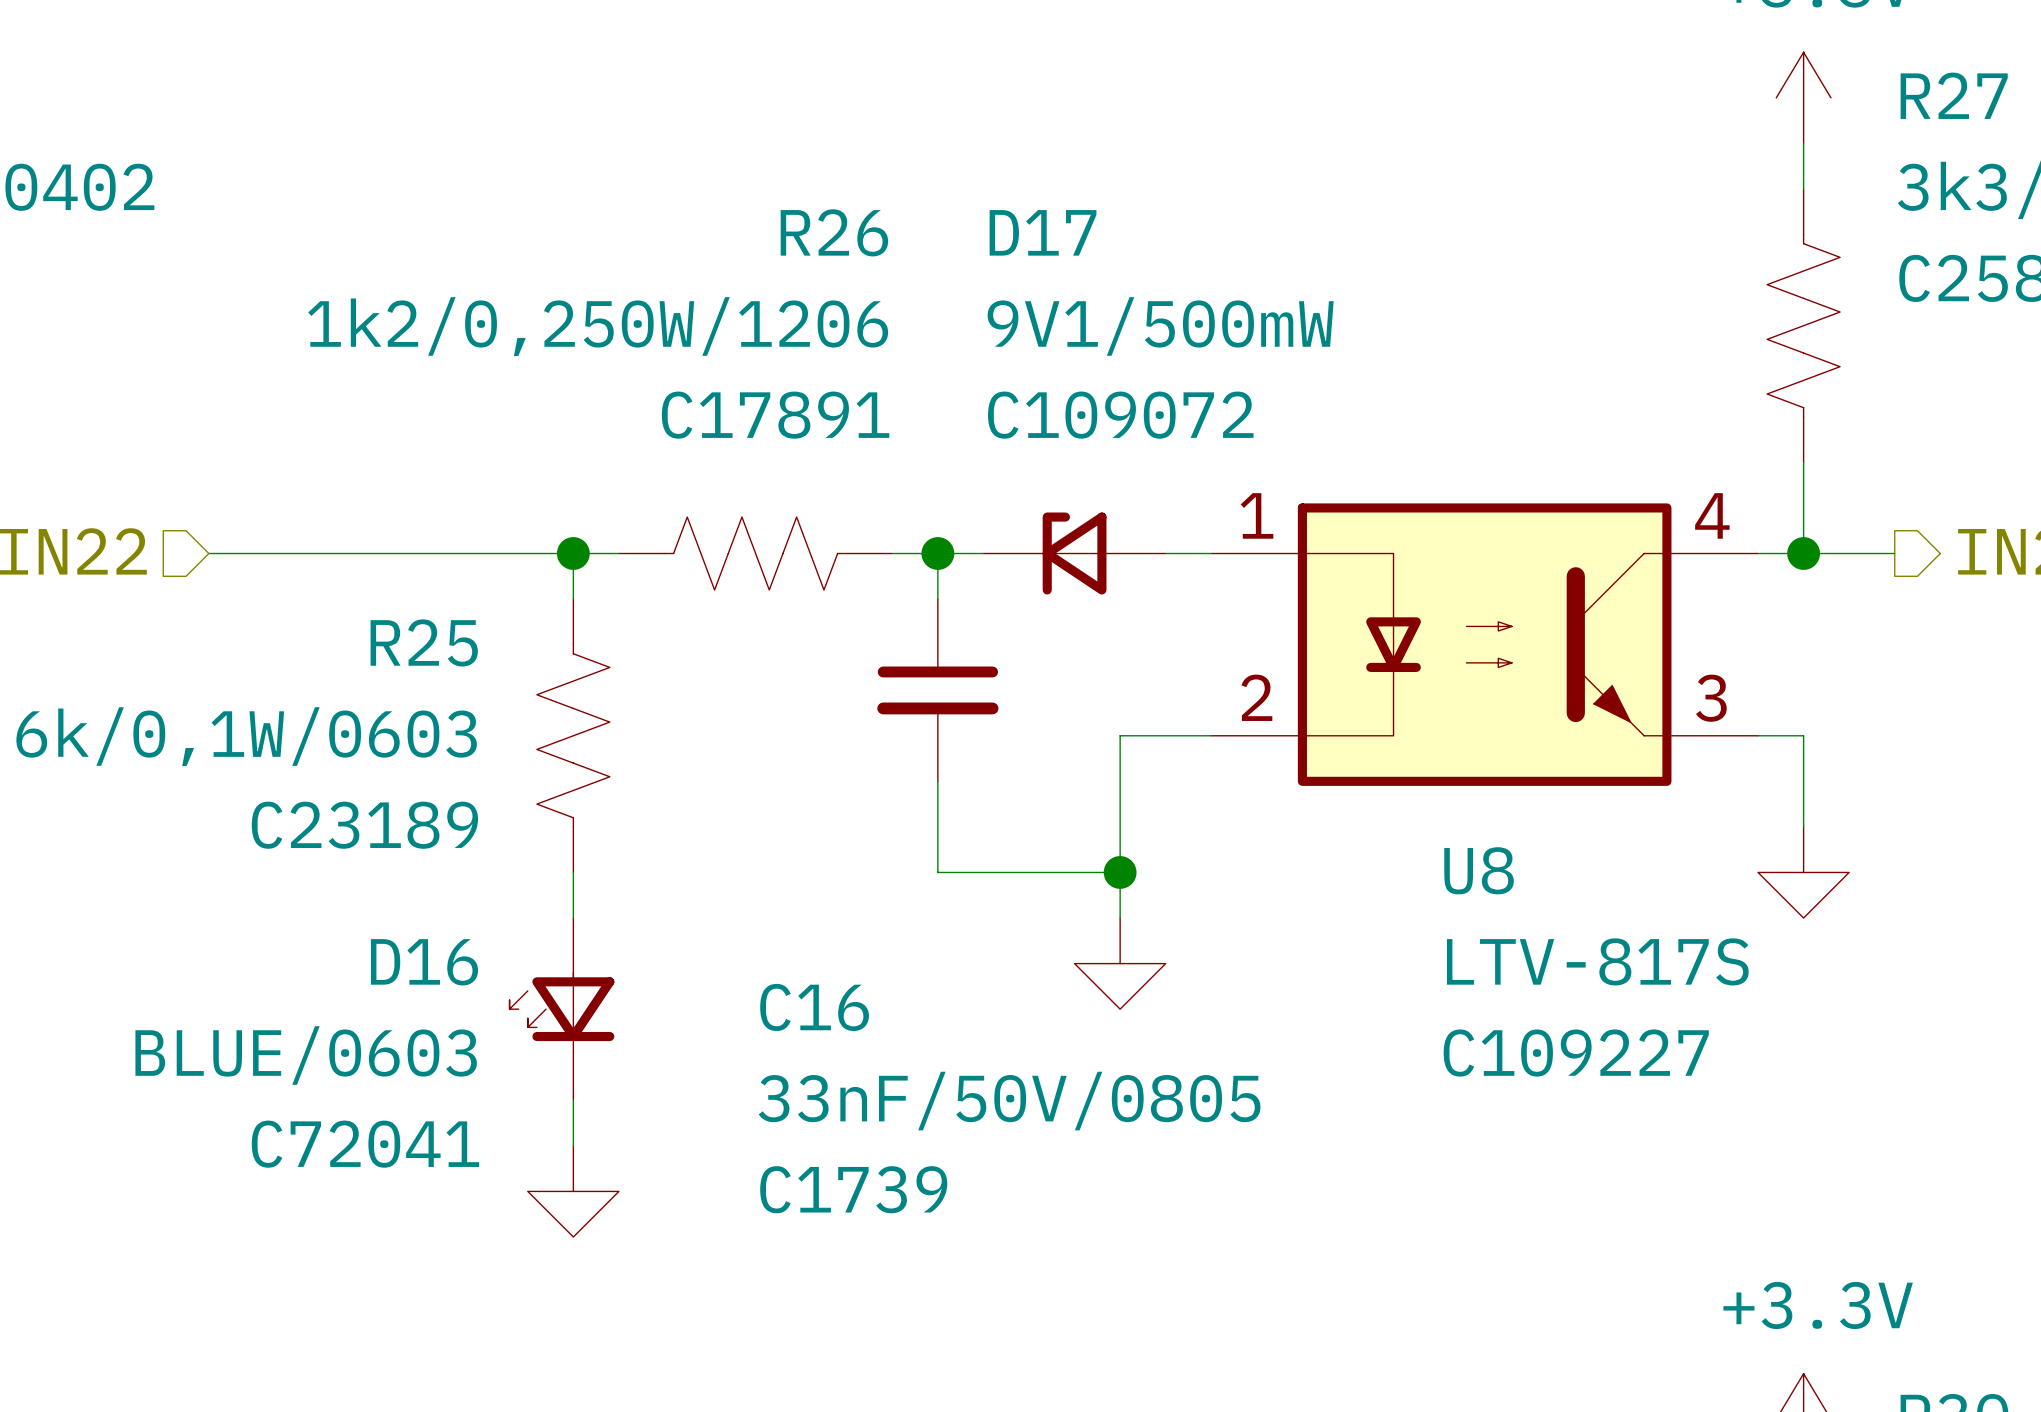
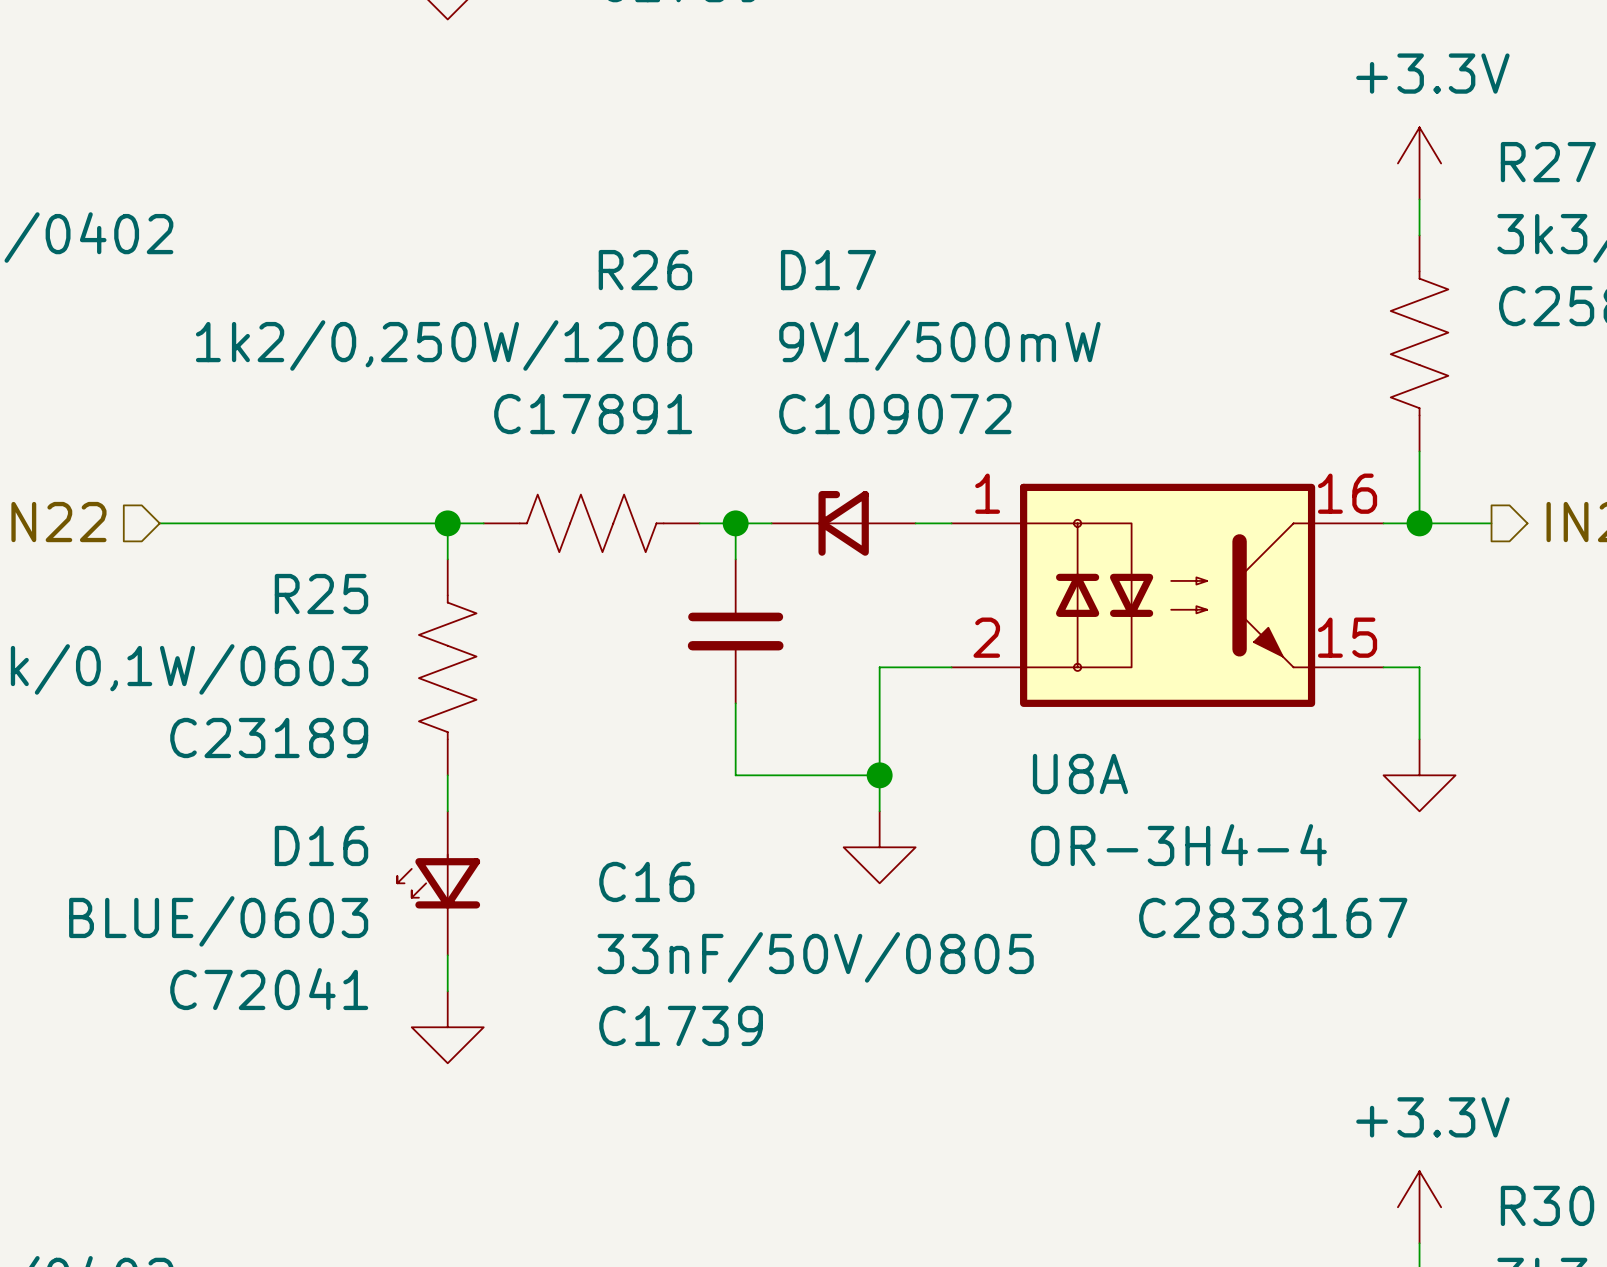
U8: LTV-817S (1484, 644) -> none
U8A: none -> OR-3H4-4 (1167, 595)

